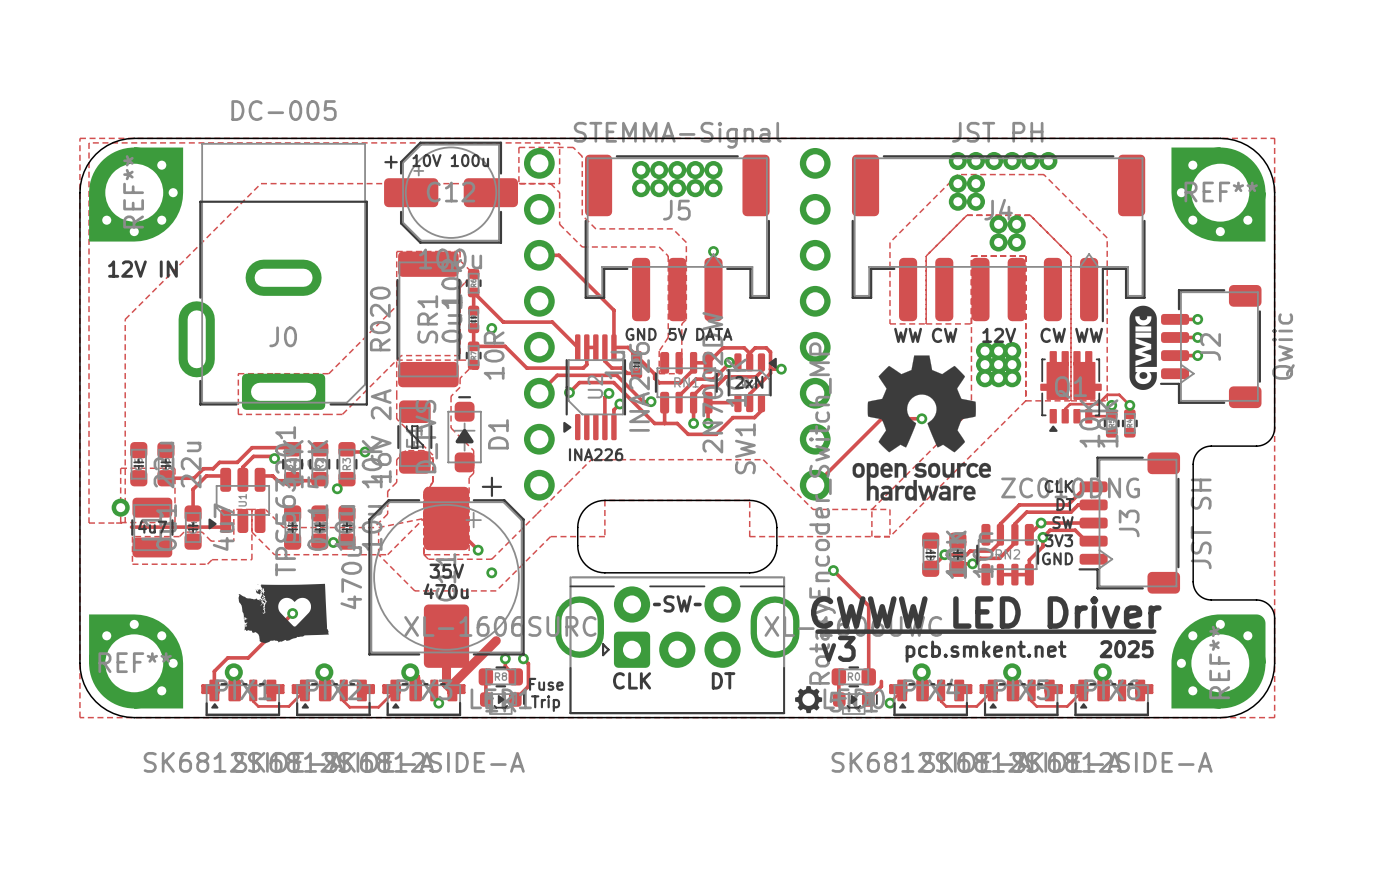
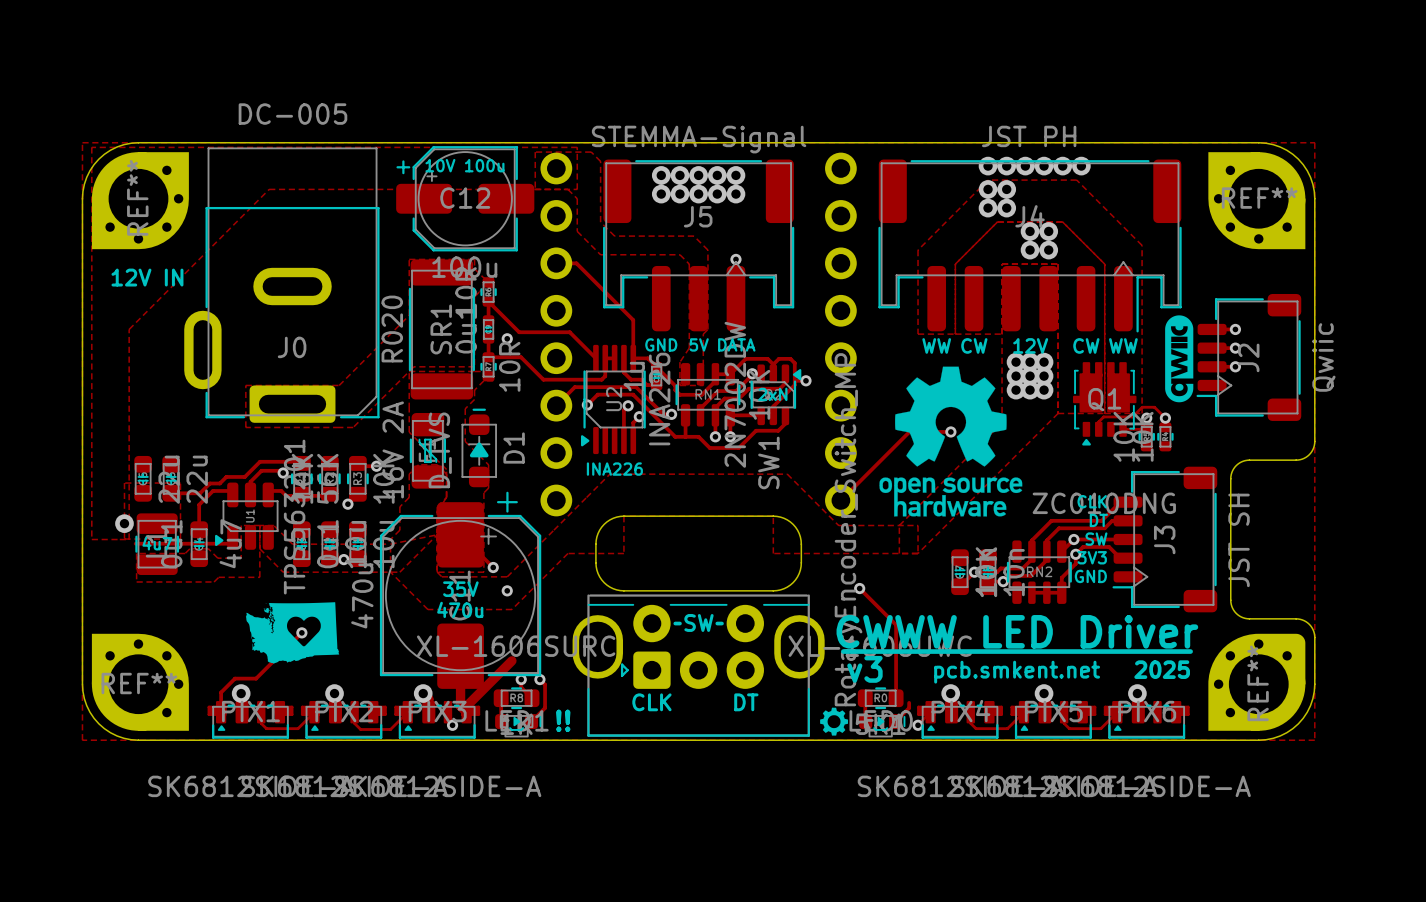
text: Fuse (546, 684) -> none
text: none -> !! (563, 720)
text: Trip (545, 703) -> none

